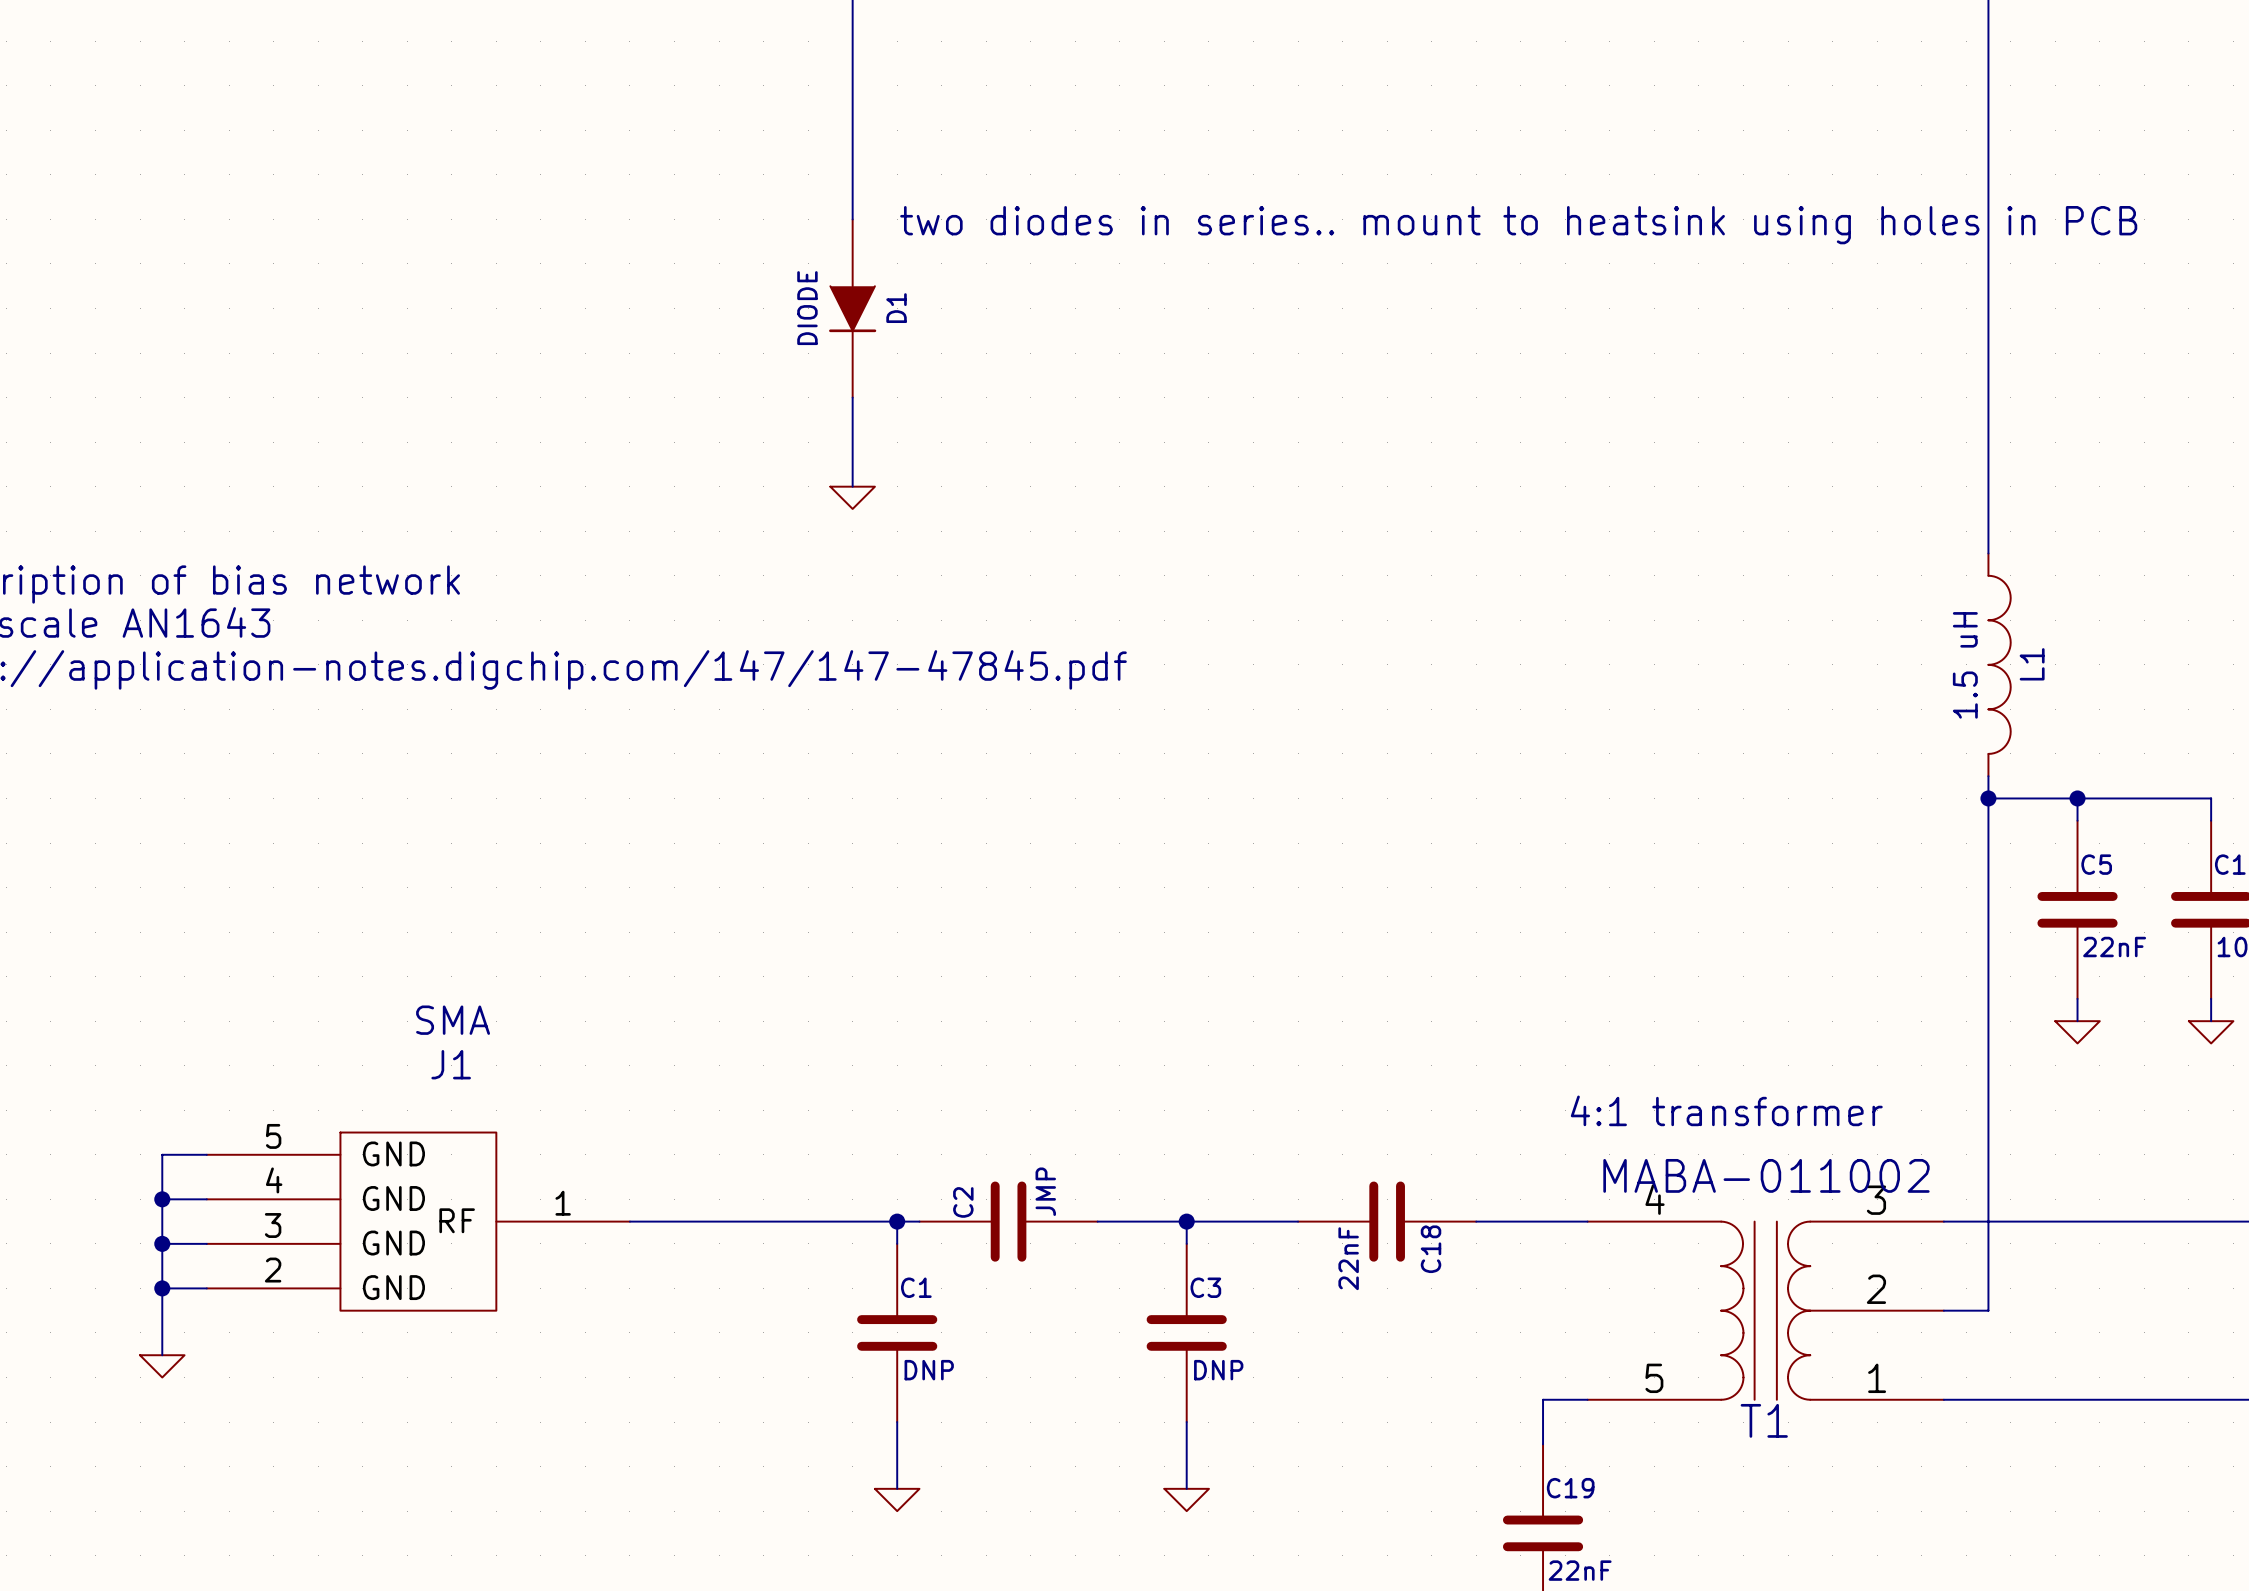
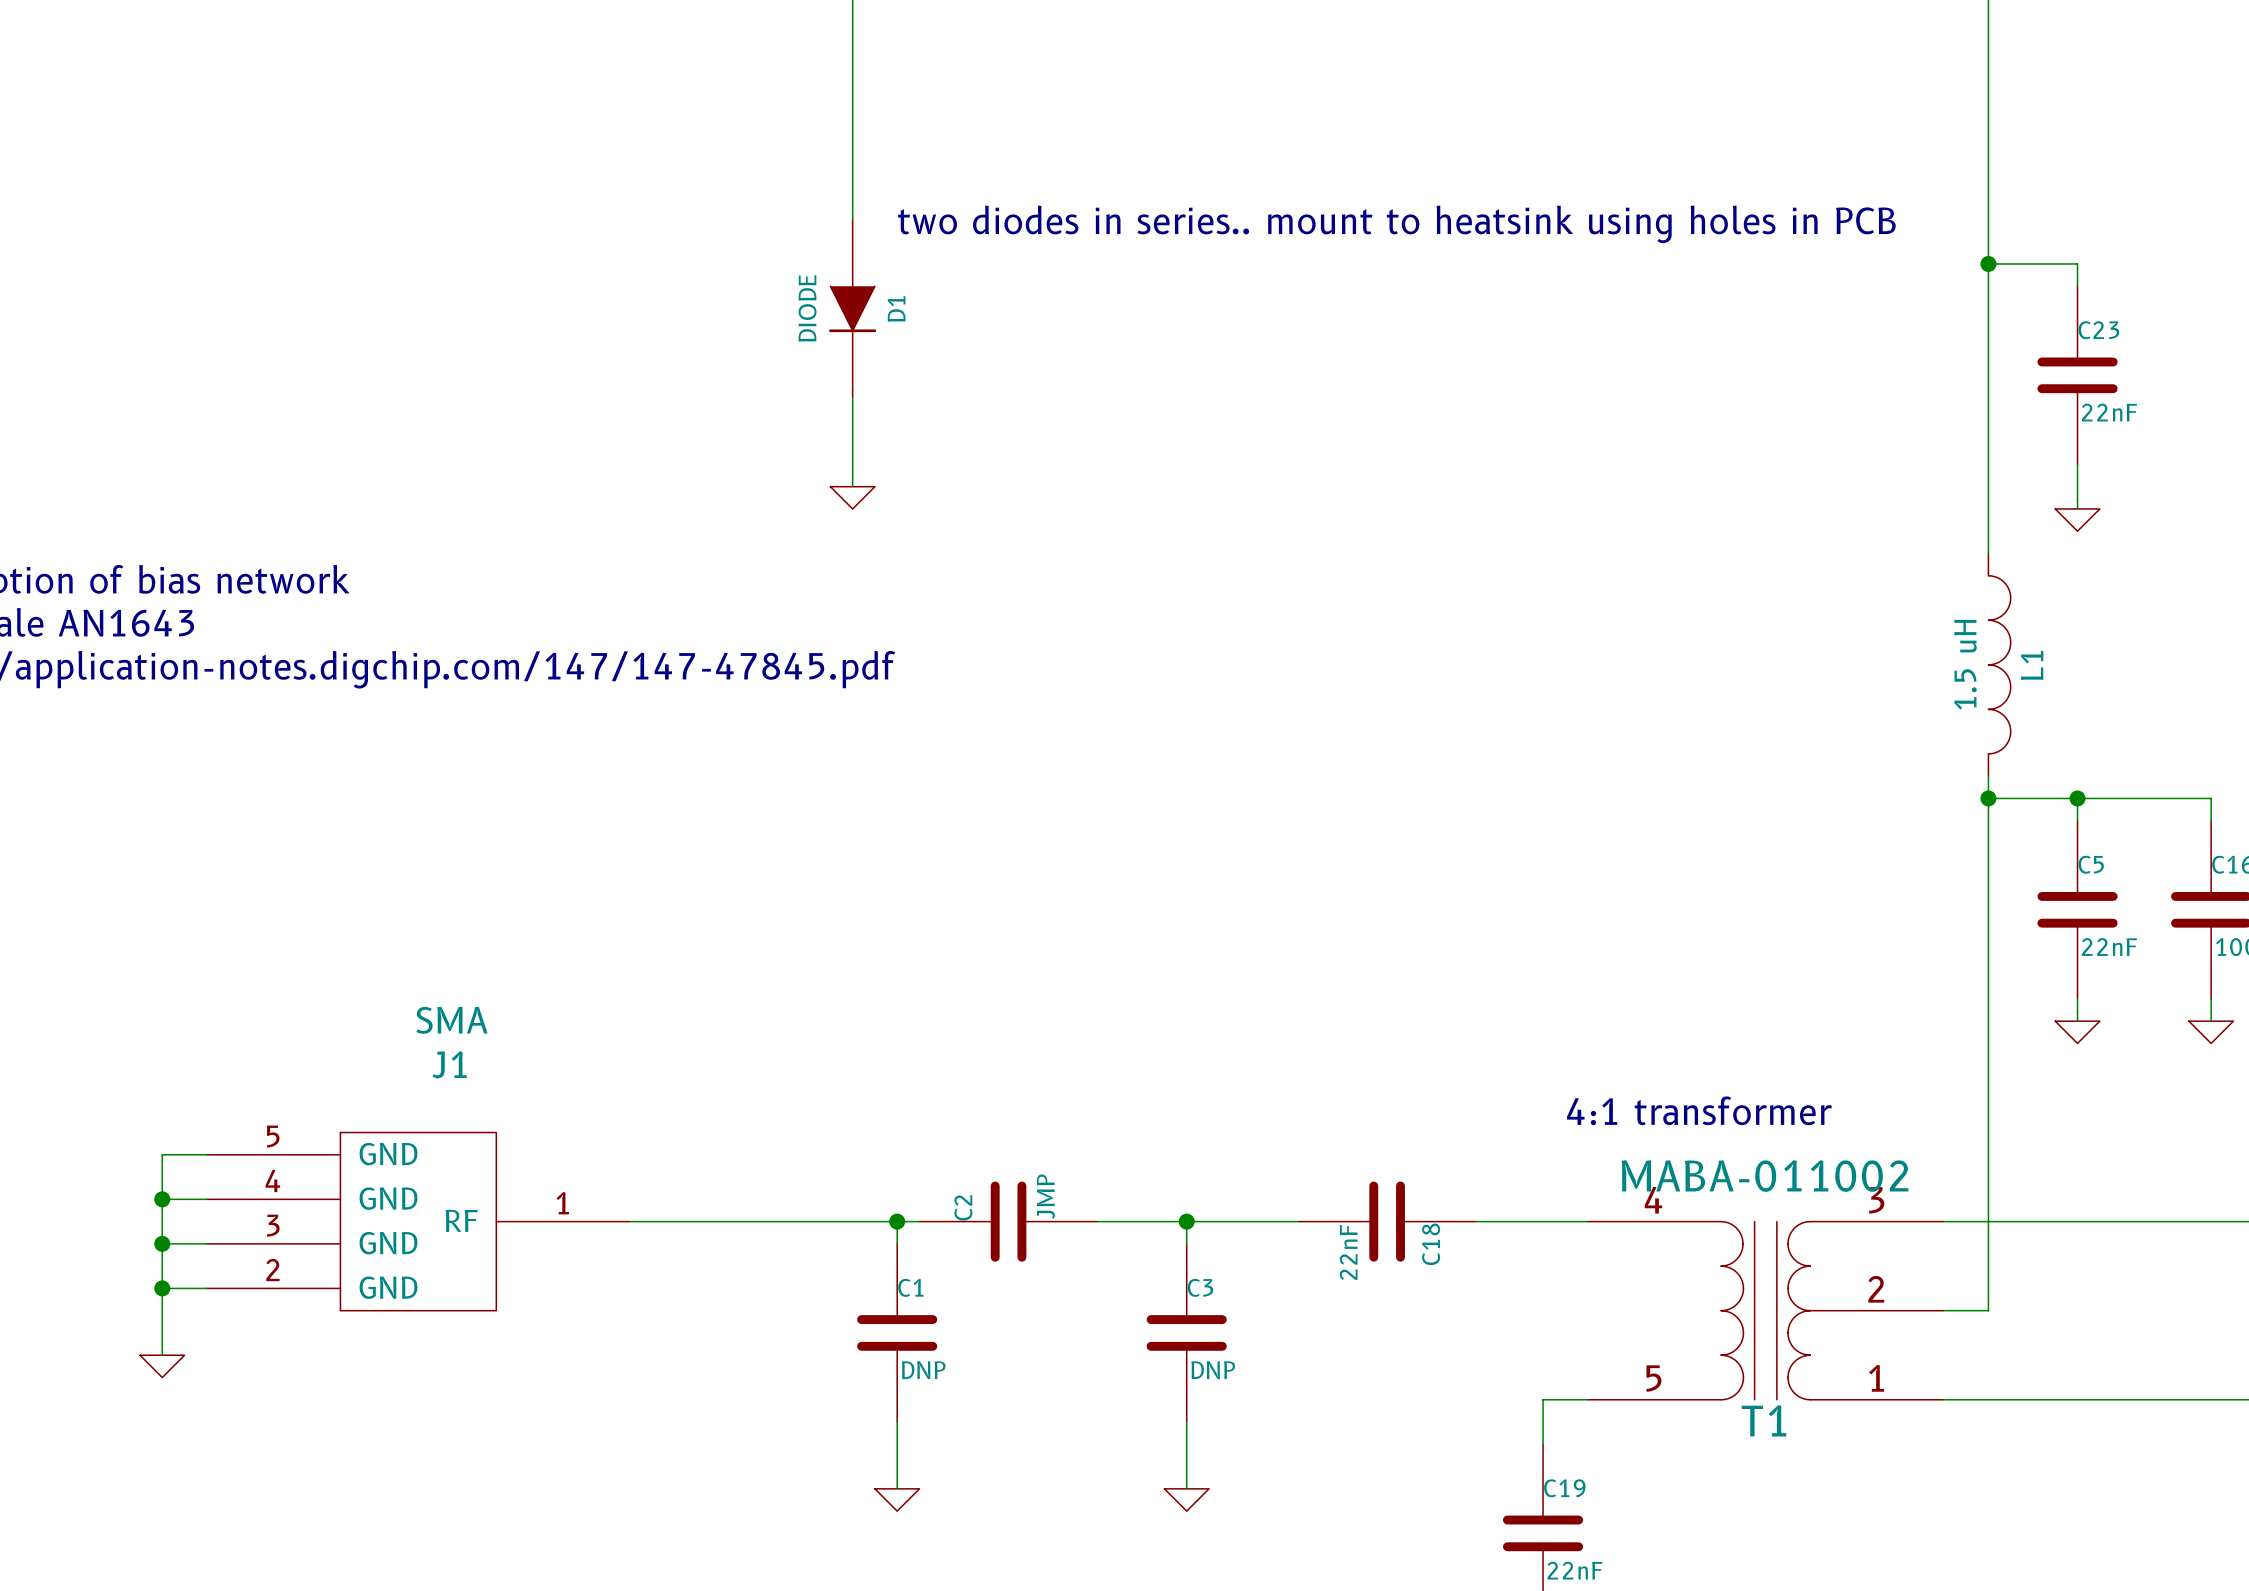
wire: none -> (1988, 263) (2077, 263) (2077, 286)
junction: none -> (1988, 263)
C23: none -> 22nF (2077, 375)
wire: none -> (2077, 464) (2077, 508)
power symbol: none -> (2077, 520)

